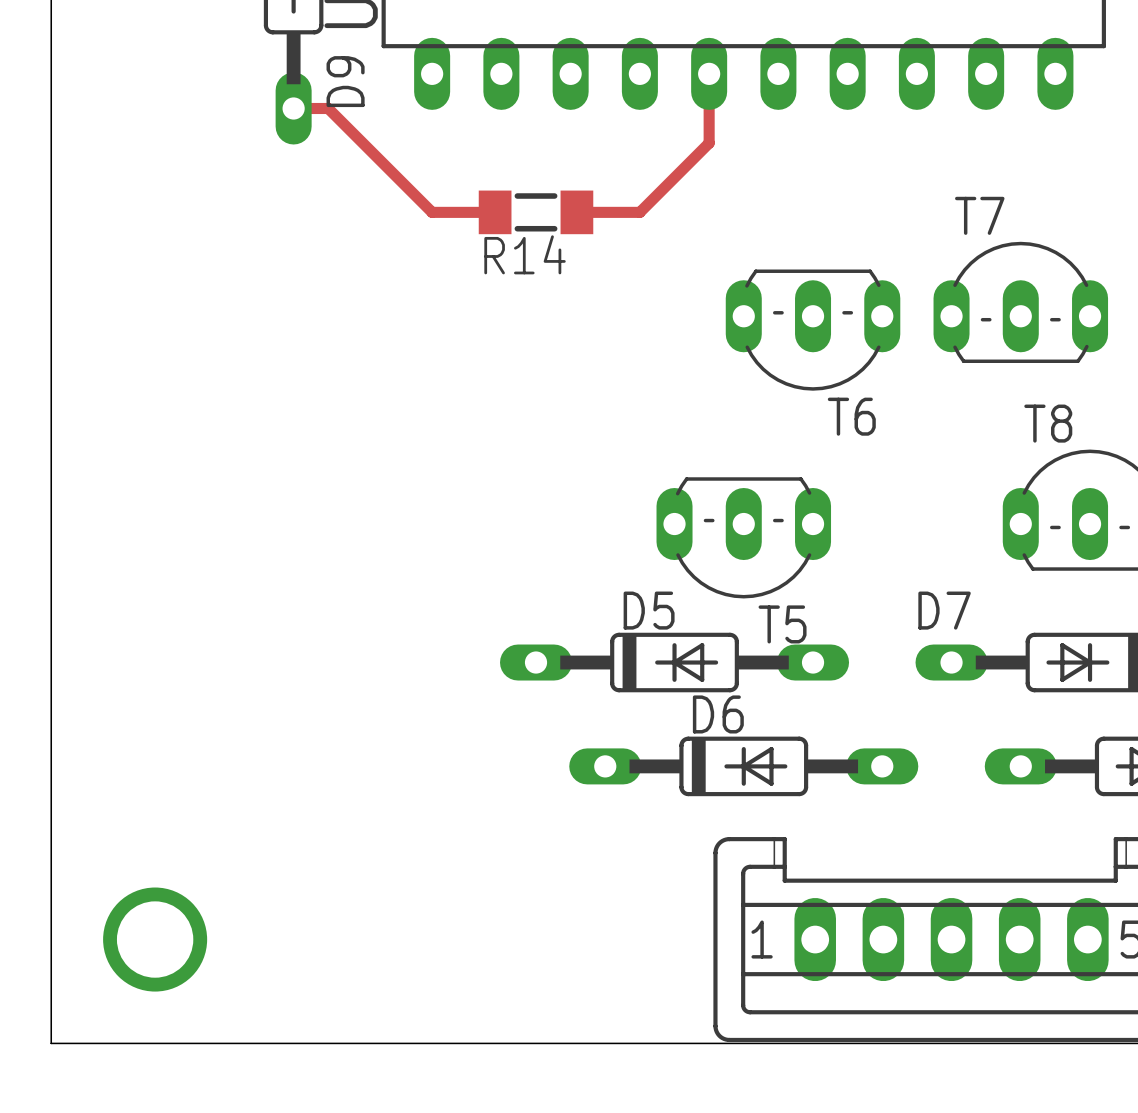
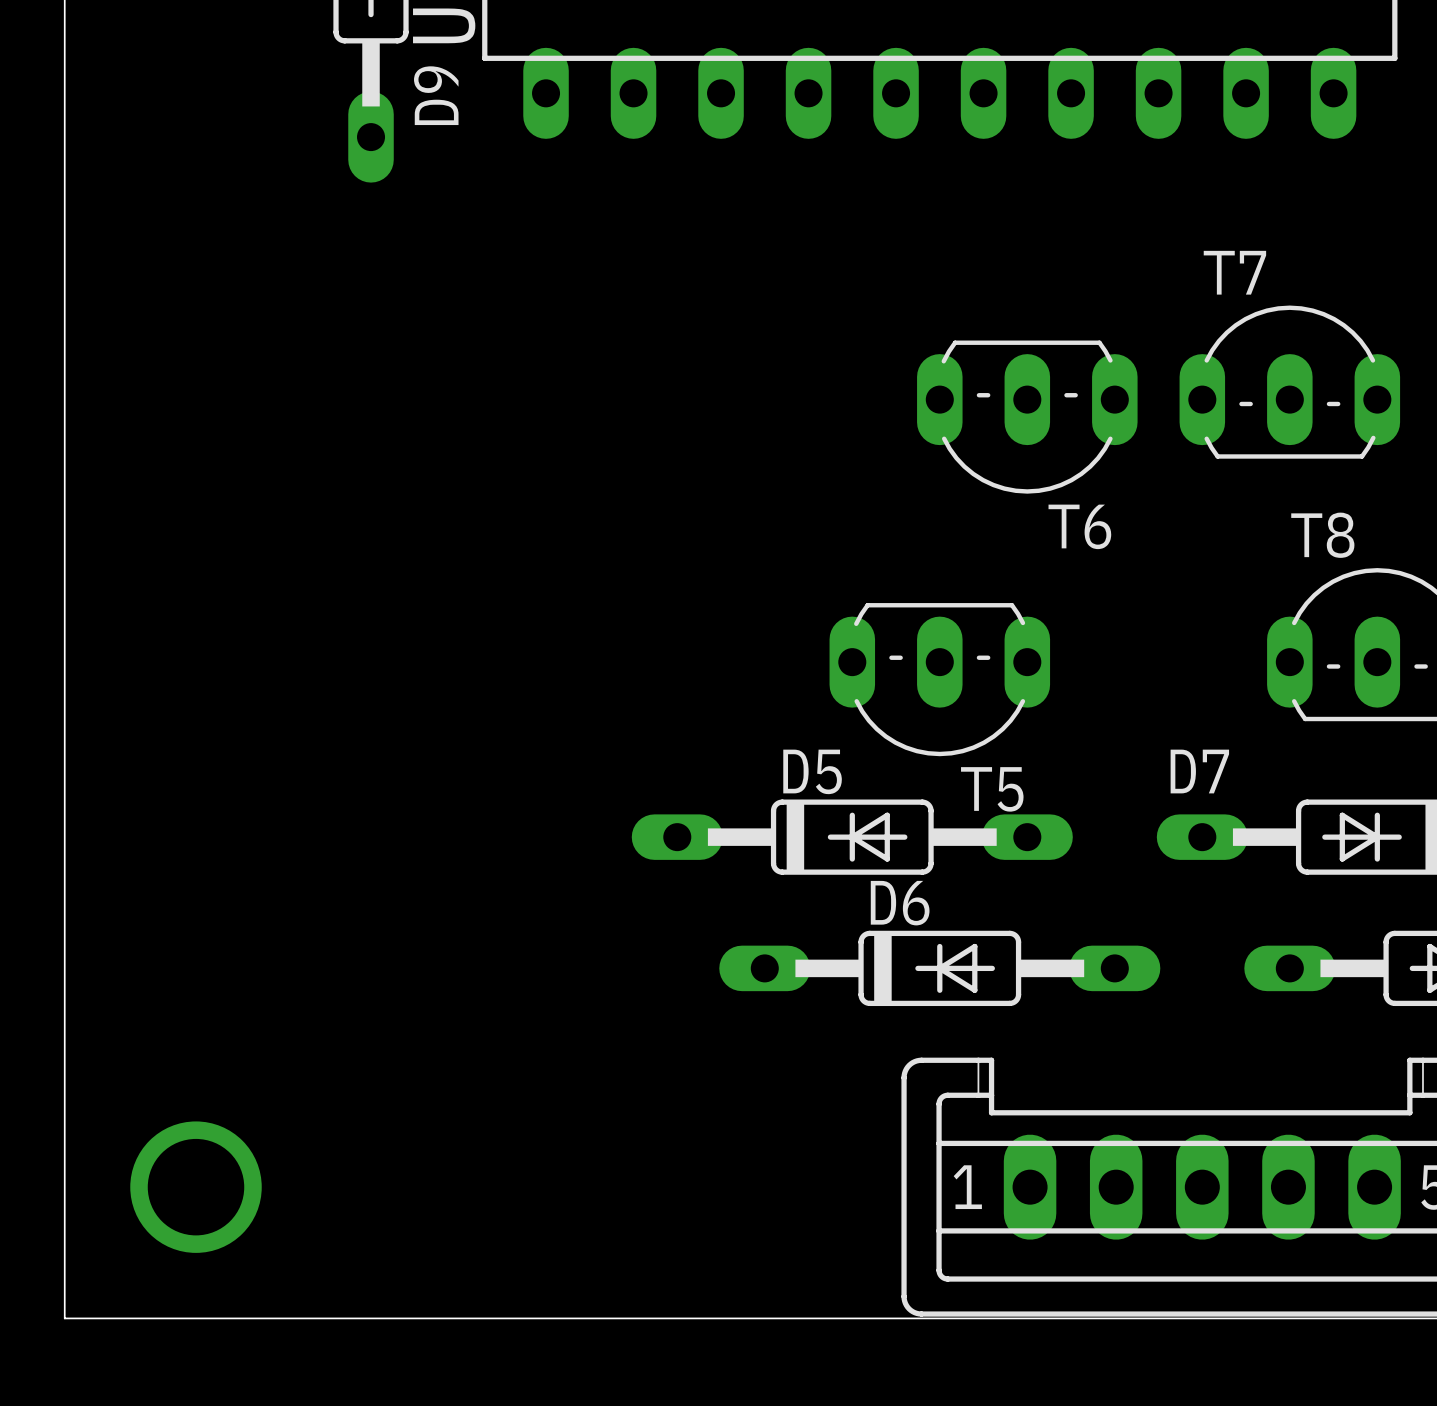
track: (709, 73) (709, 143) (639, 212) (576, 212) -> none
track: (293, 108) (328, 108) (432, 212) (495, 212) -> none
R14: (536, 212) -> none

